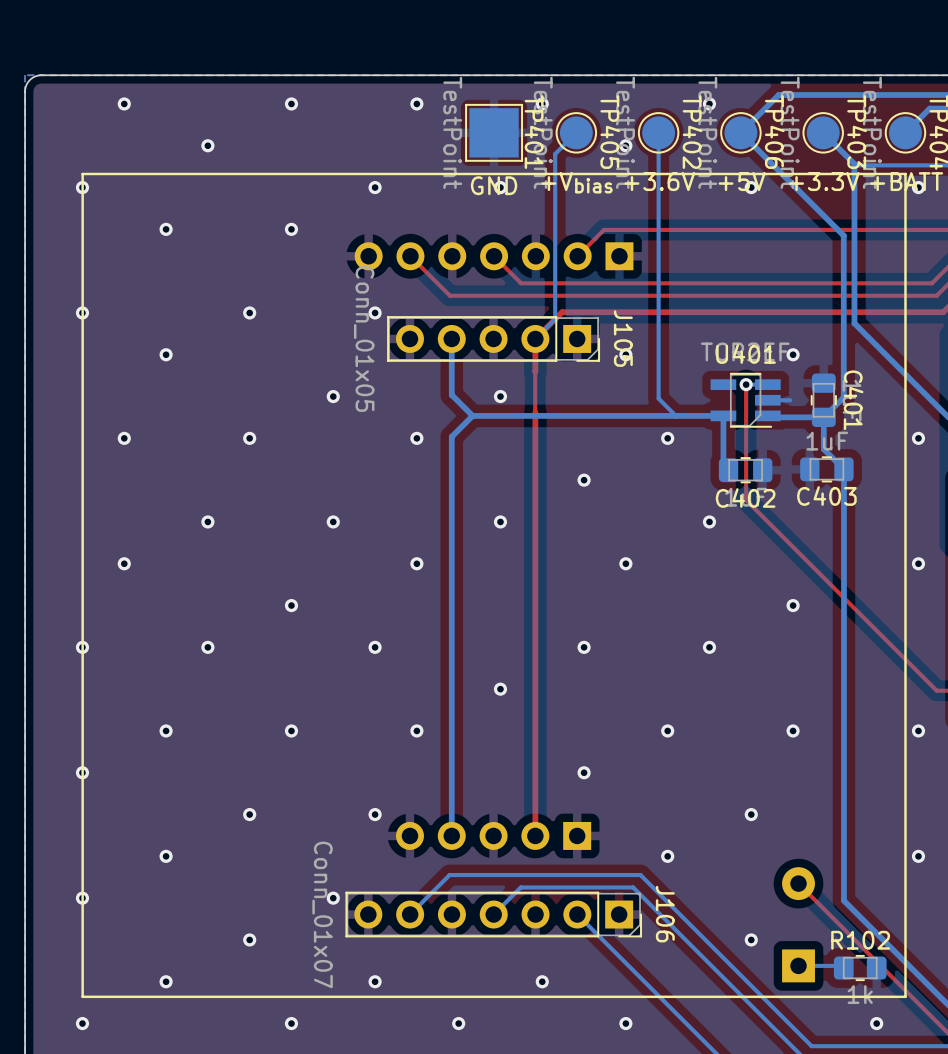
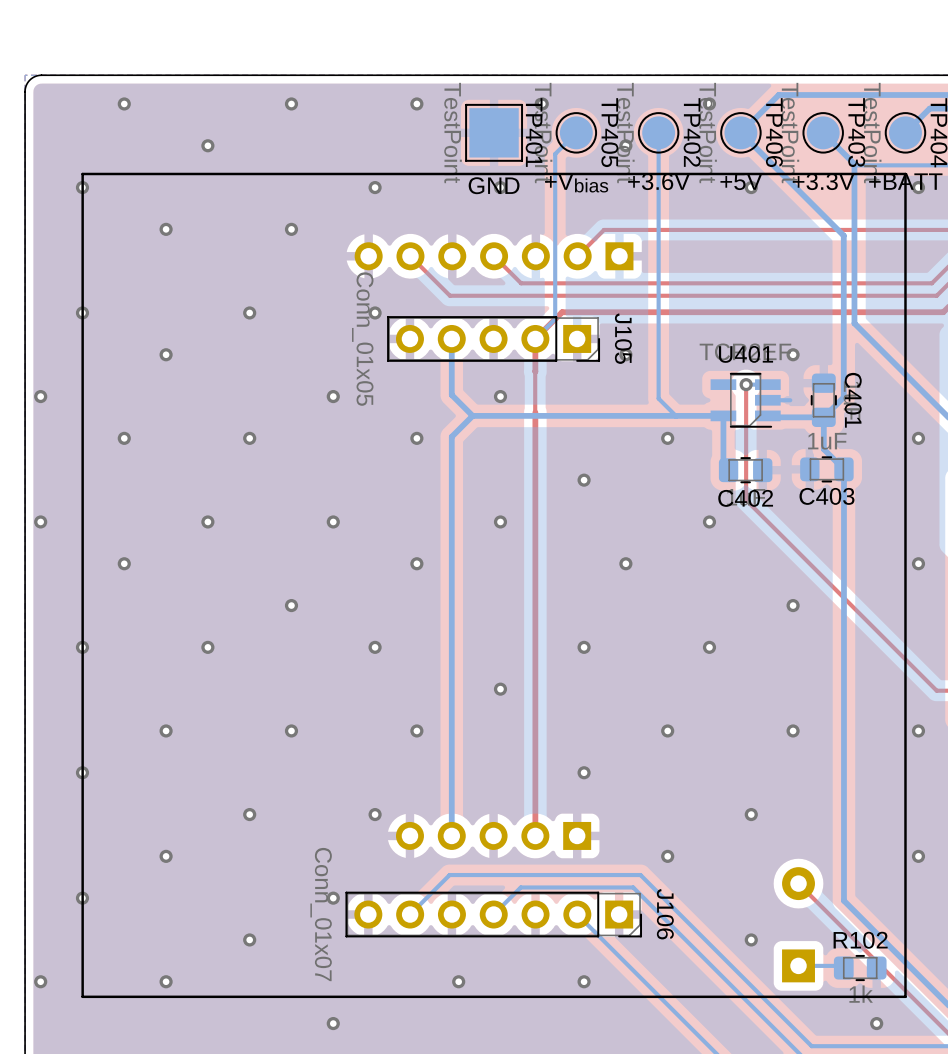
via: none -> (40, 396)
via: none -> (40, 521)
via: none -> (40, 981)
via: (375, 981) -> none
via: none -> (458, 981)
via: (542, 981) -> none
via: none -> (584, 981)
via: (82, 1023) -> none
via: (291, 1023) -> none
via: none -> (333, 1023)
via: (458, 1023) -> none
via: (625, 1023) -> none

